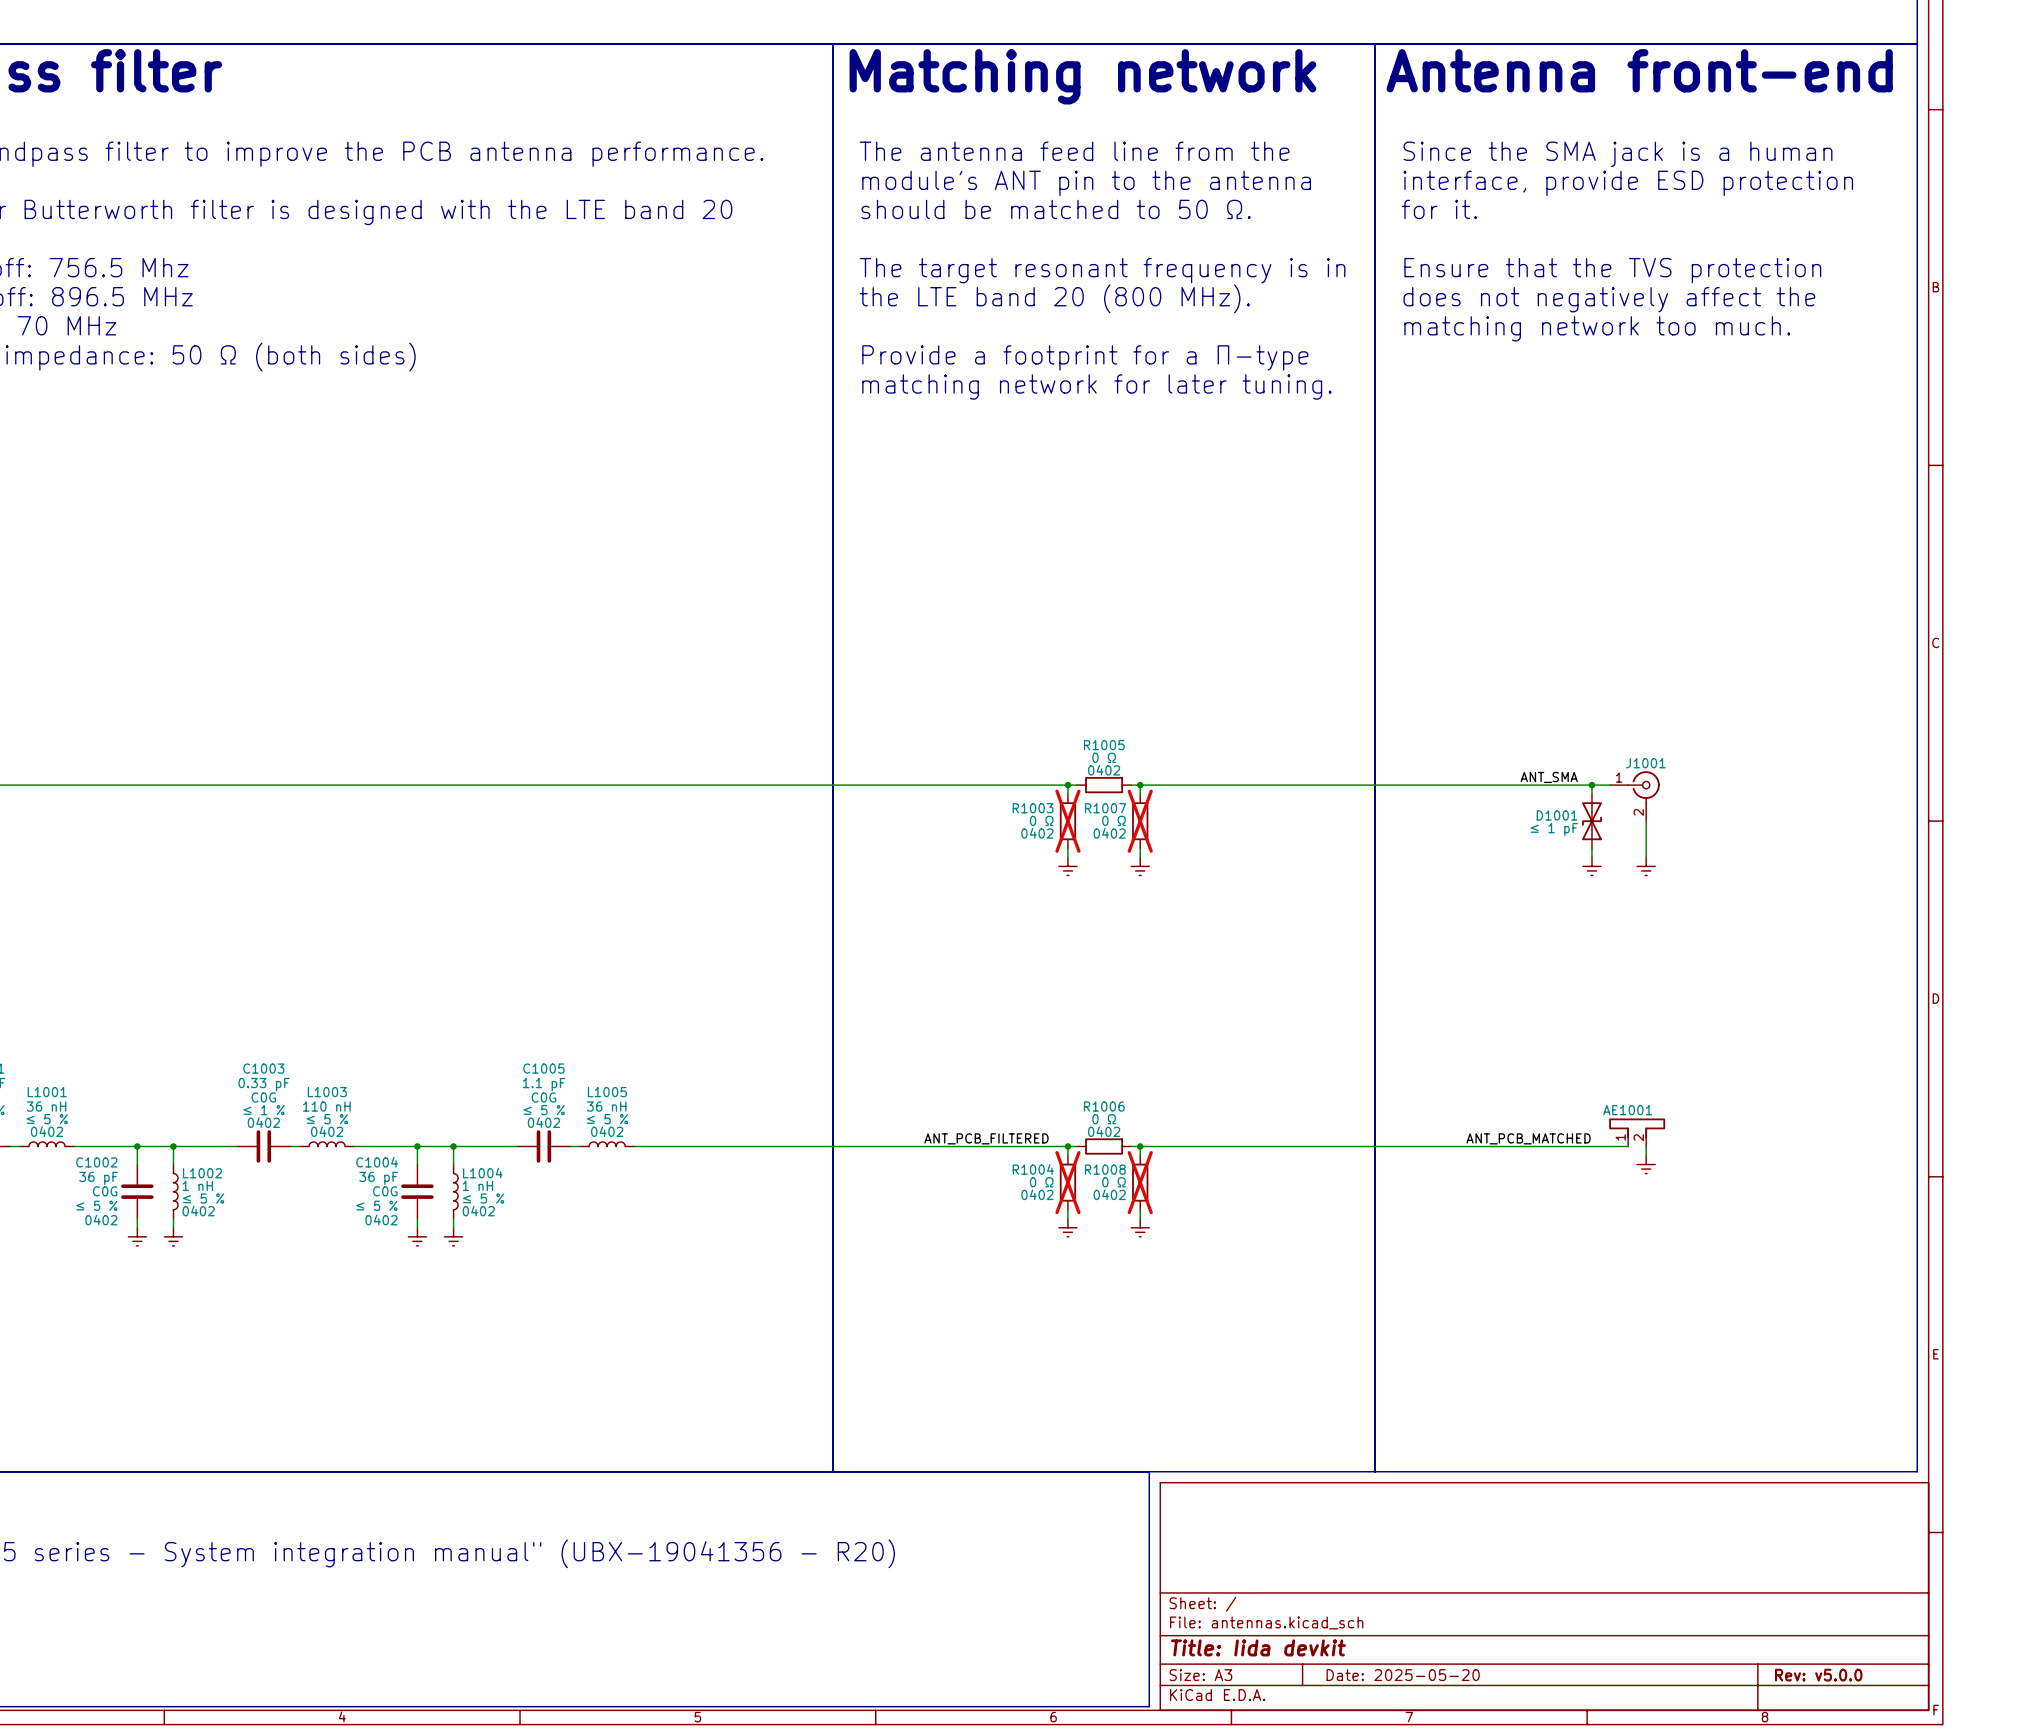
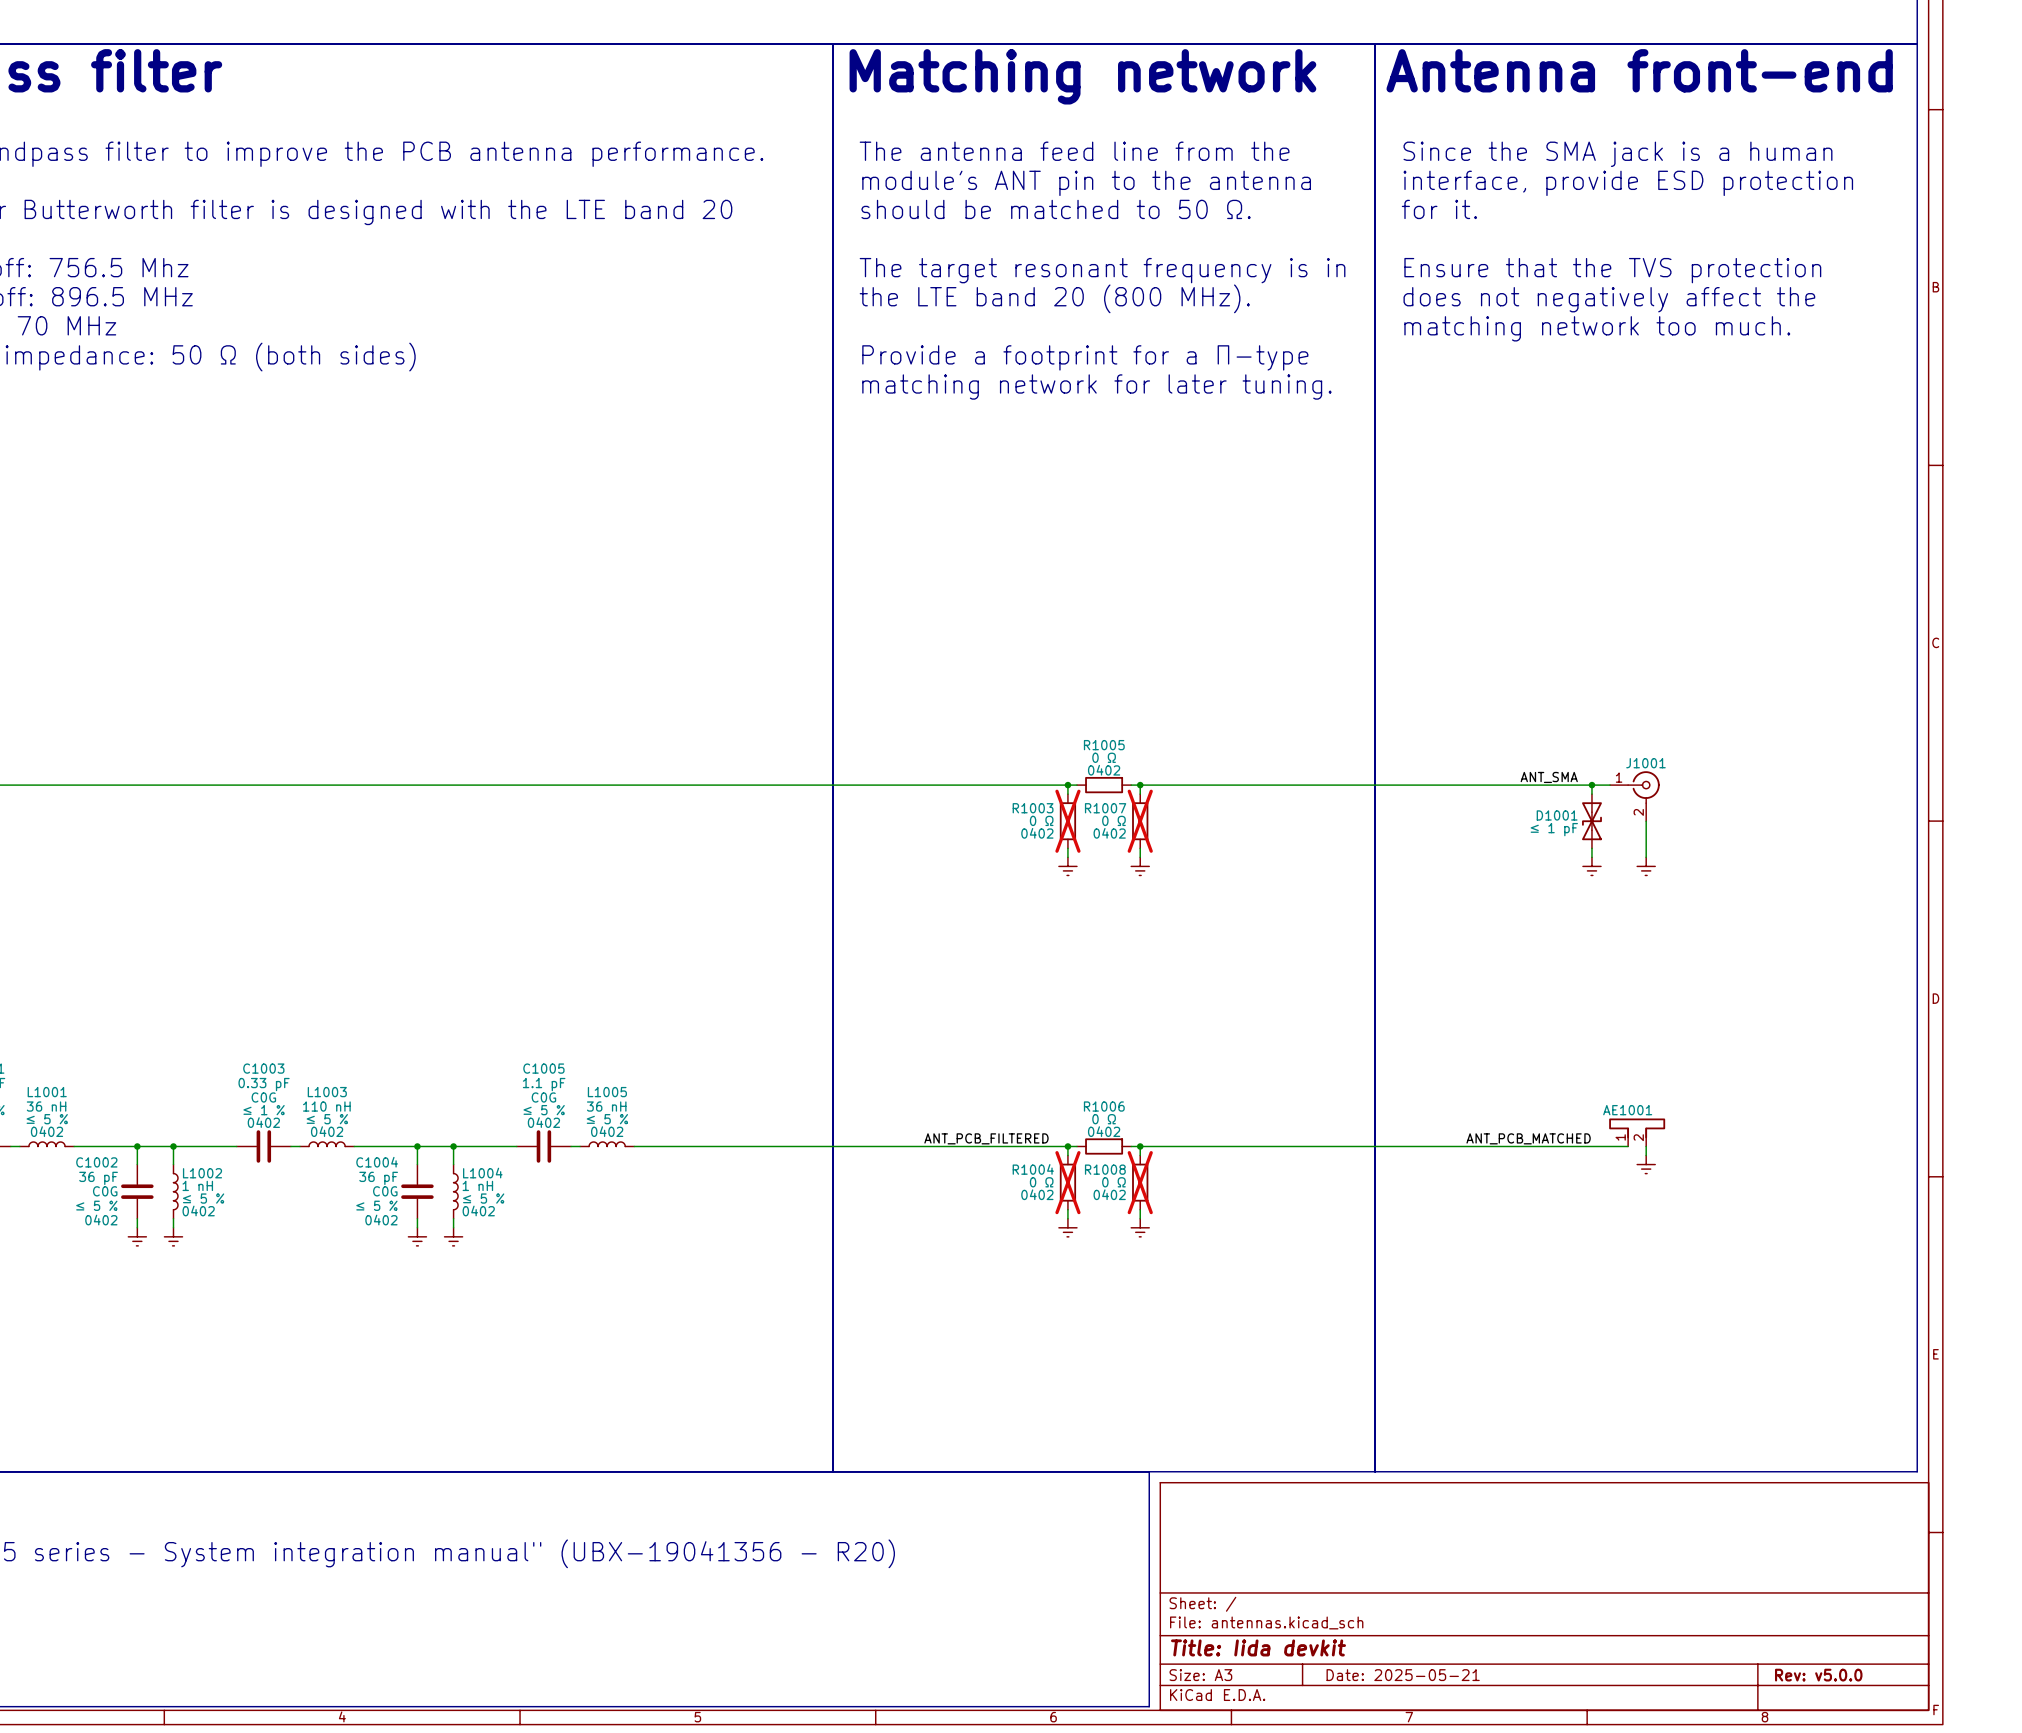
title block: Date: 2025-05-20 (1403, 1675) -> Date: 2025-05-21 (1403, 1675)

